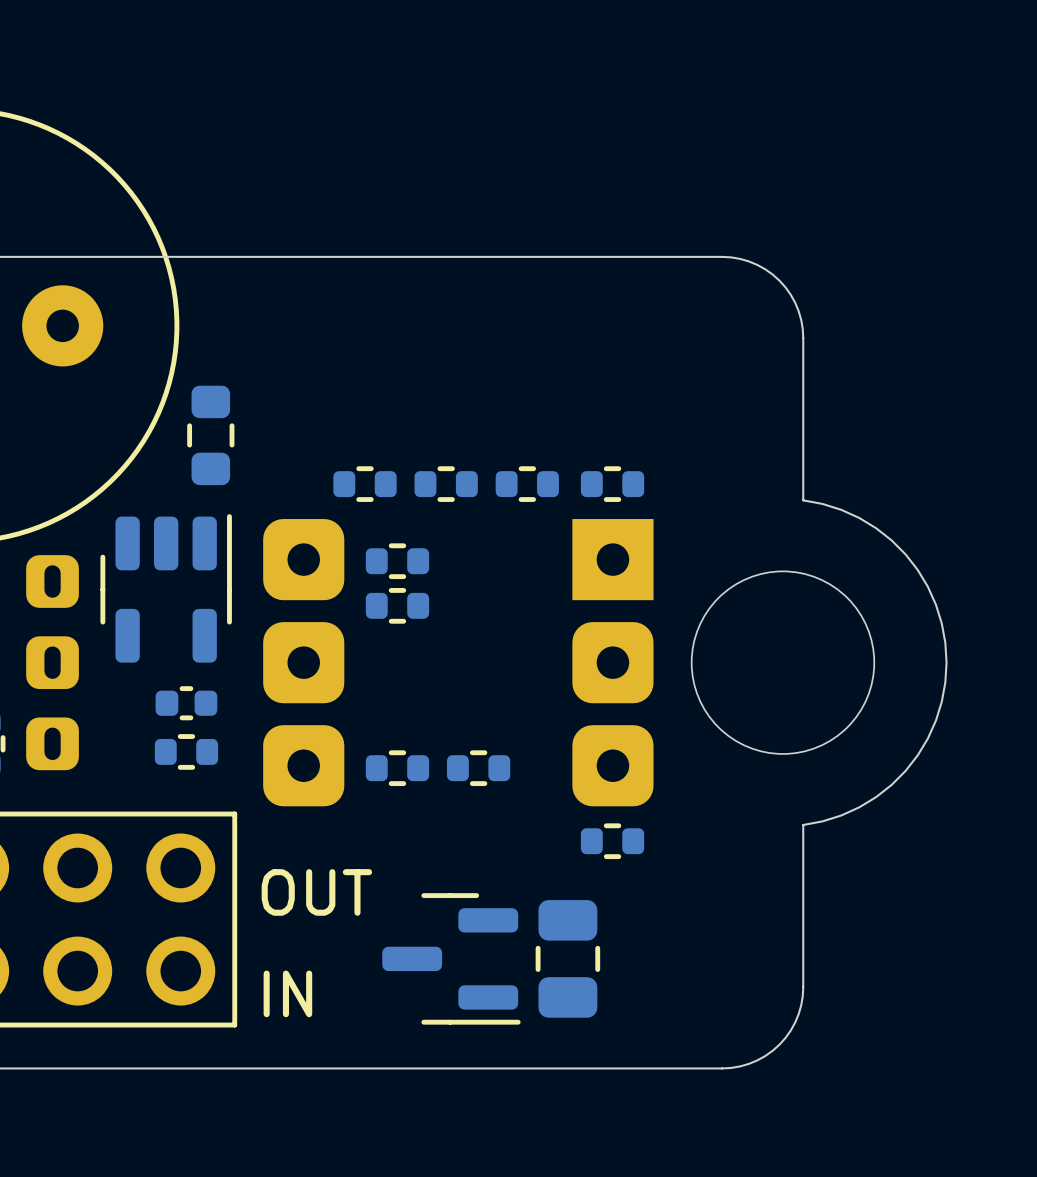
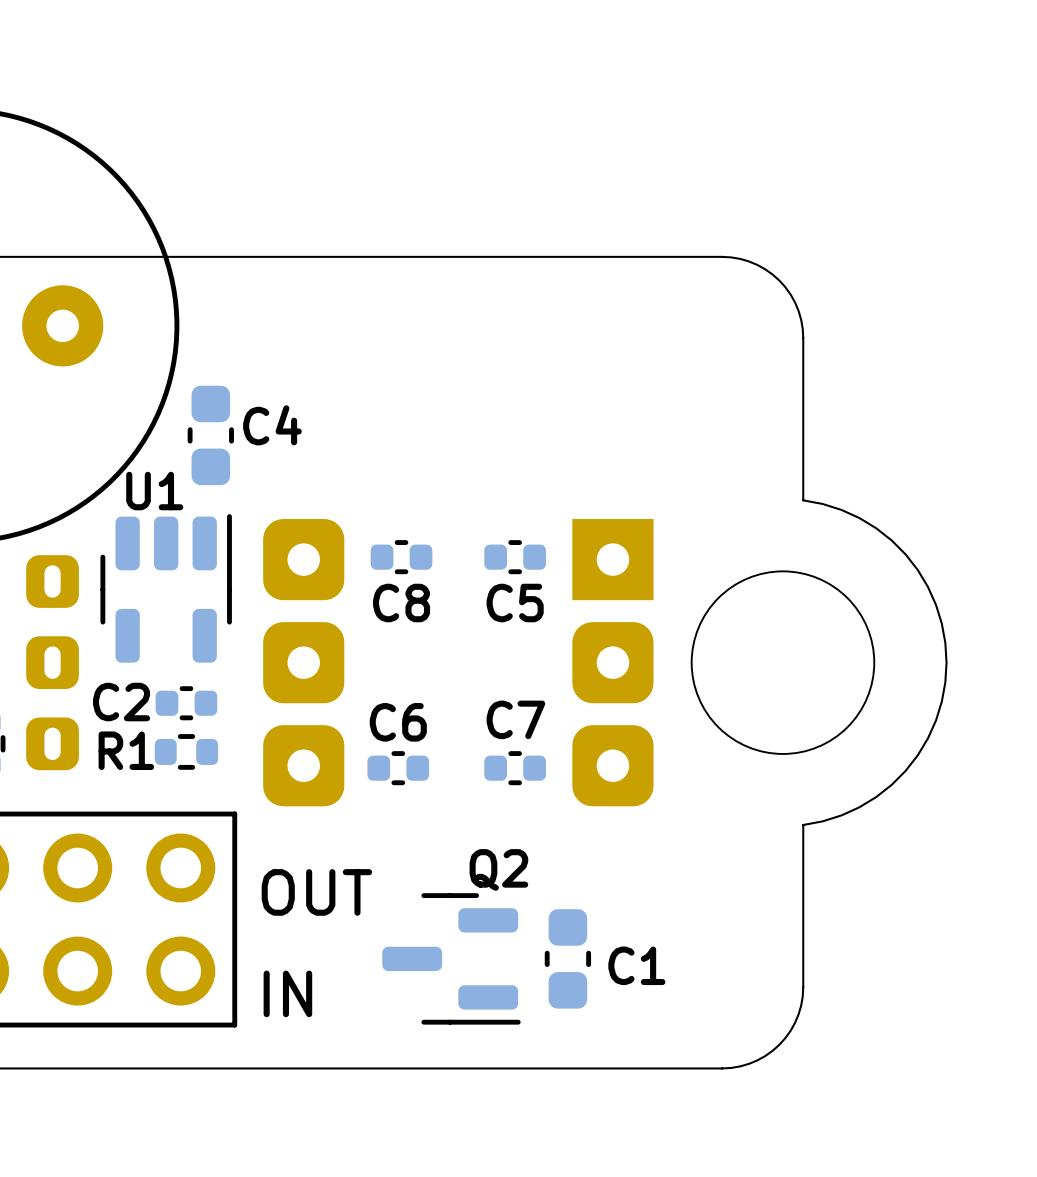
part: (210, 435) -> none
C4: none -> (210, 435)
part: (365, 484) -> none
part: (446, 484) -> none
part: (527, 484) -> none
part: (612, 484) -> none
U1 name: none -> U1 (154, 491)
C8: none -> (401, 557)
C5: none -> (515, 557)
part: (397, 561) -> none
part: (397, 605) -> none
C2 name: none -> C2 (121, 702)
R1 name: none -> R1 (126, 750)
part: (397, 768) -> none
C6: none -> (398, 768)
part: (478, 768) -> none
C7: none -> (515, 768)
part: (612, 841) -> none
Q2 name: none -> Q2 (498, 869)
part: (567, 958) -> none
C1: none -> (567, 958)

